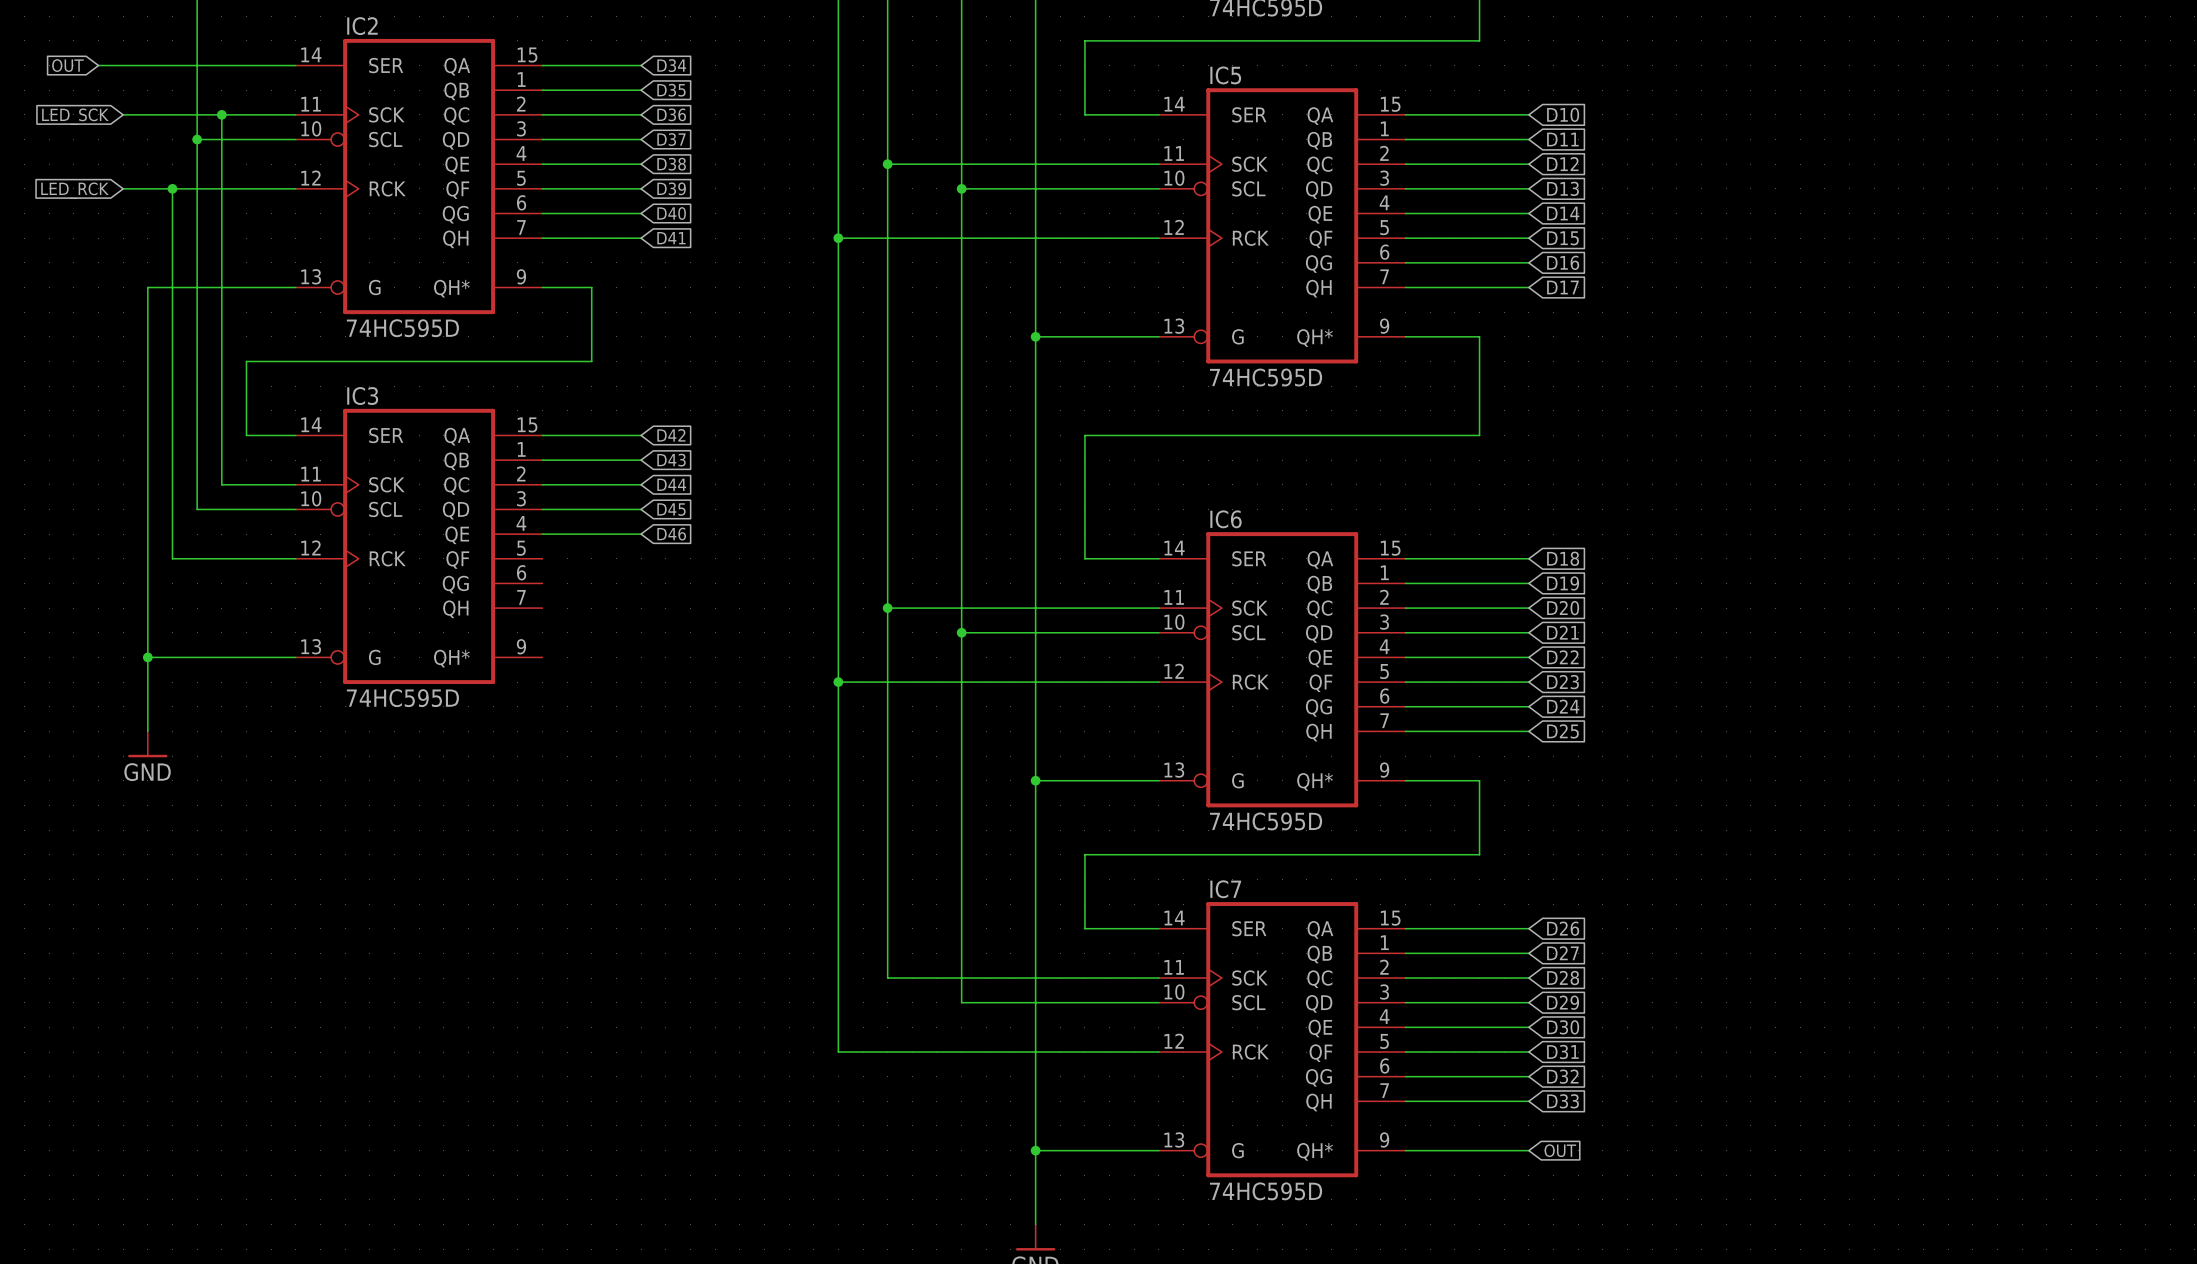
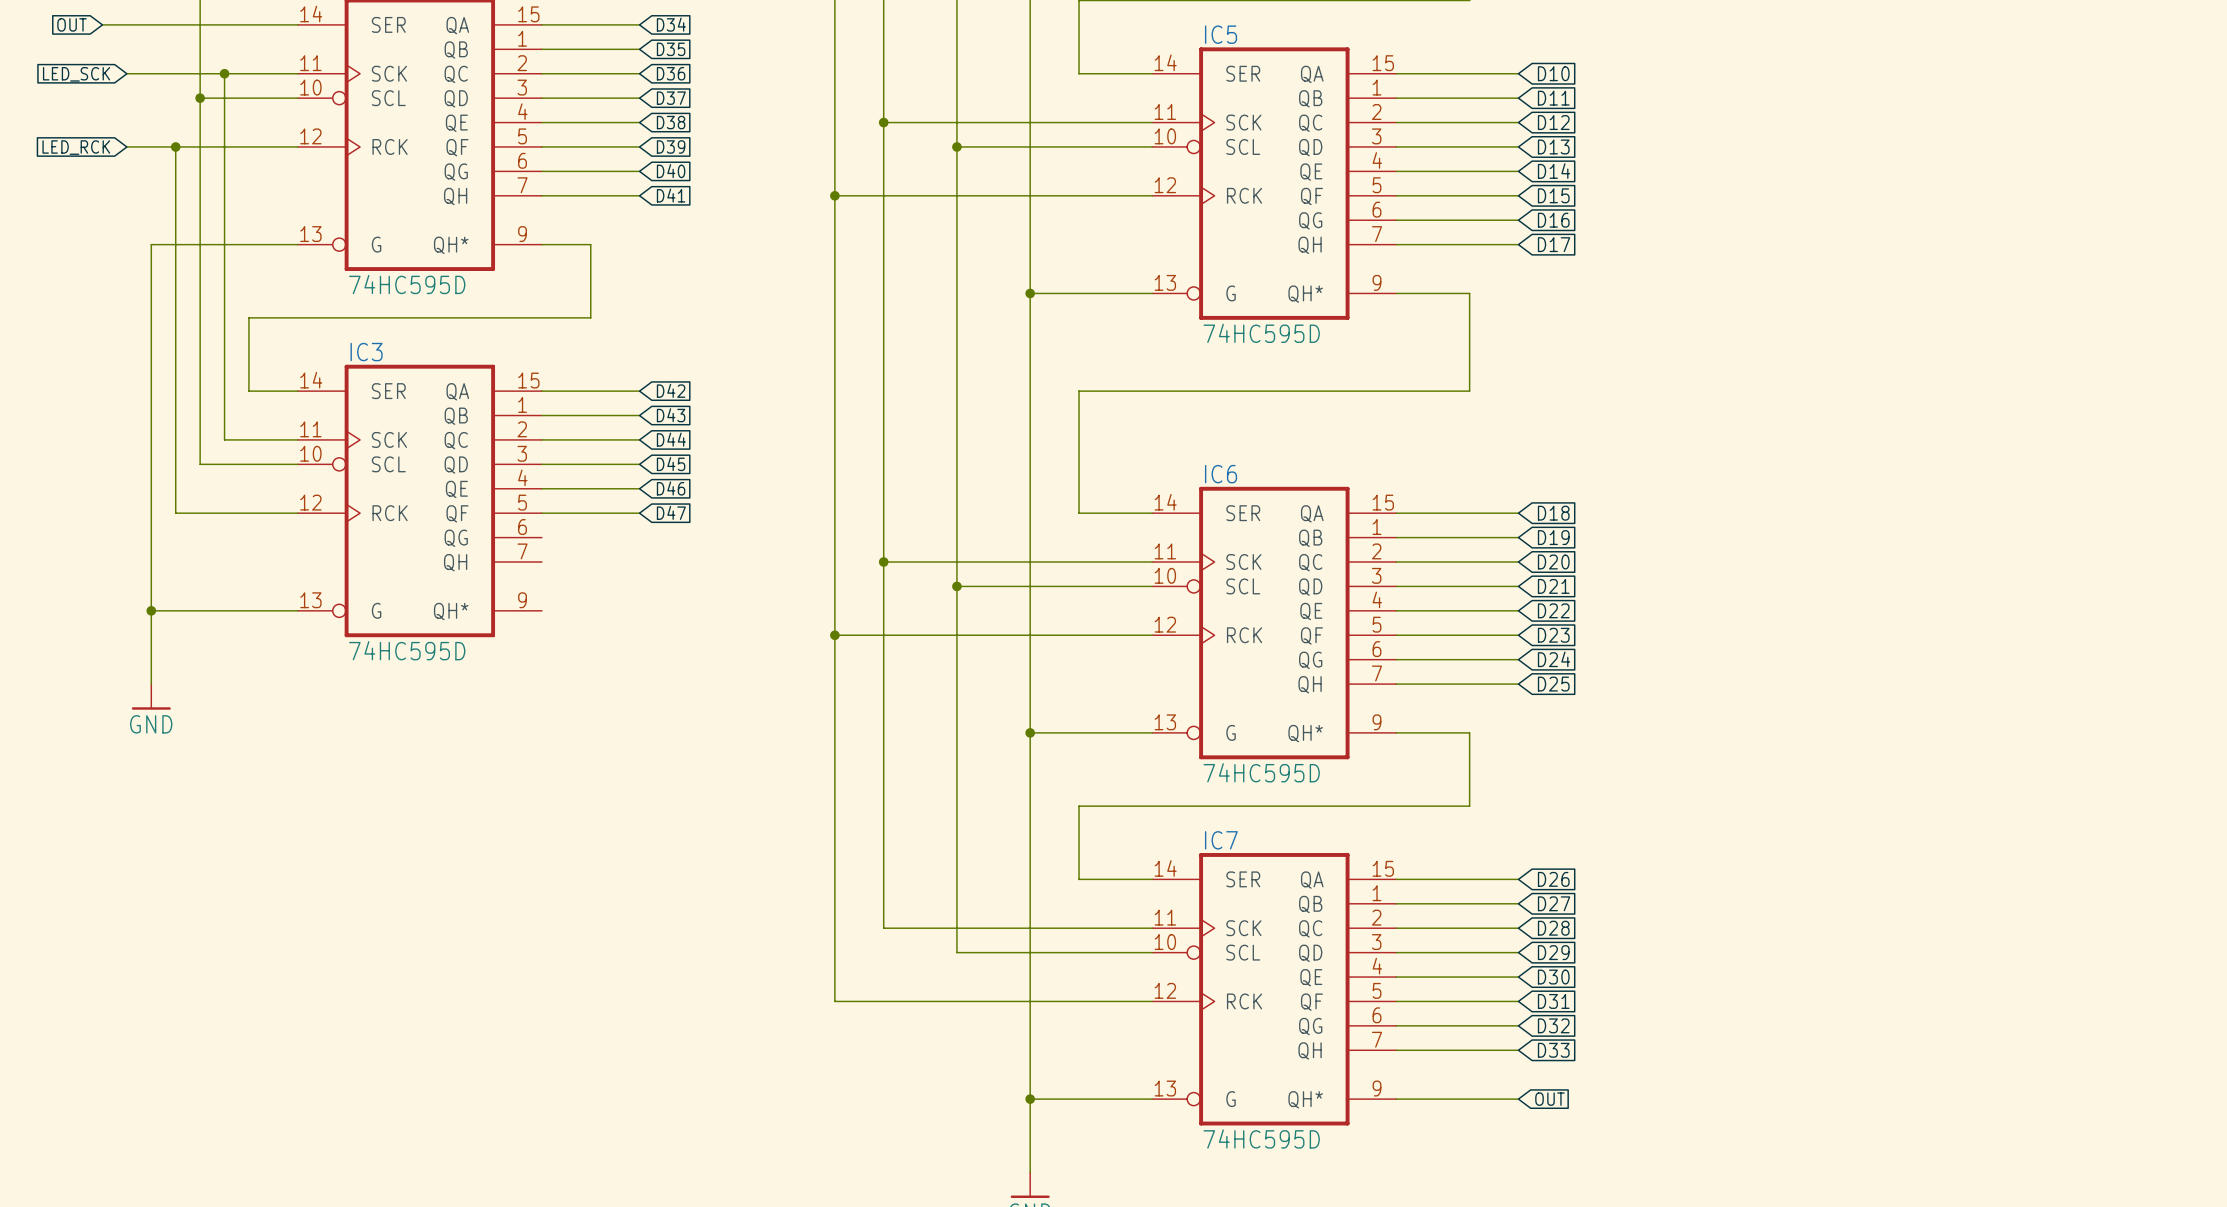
wire: none -> (541, 513) (639, 513)
global label: none -> D47 (671, 512)

